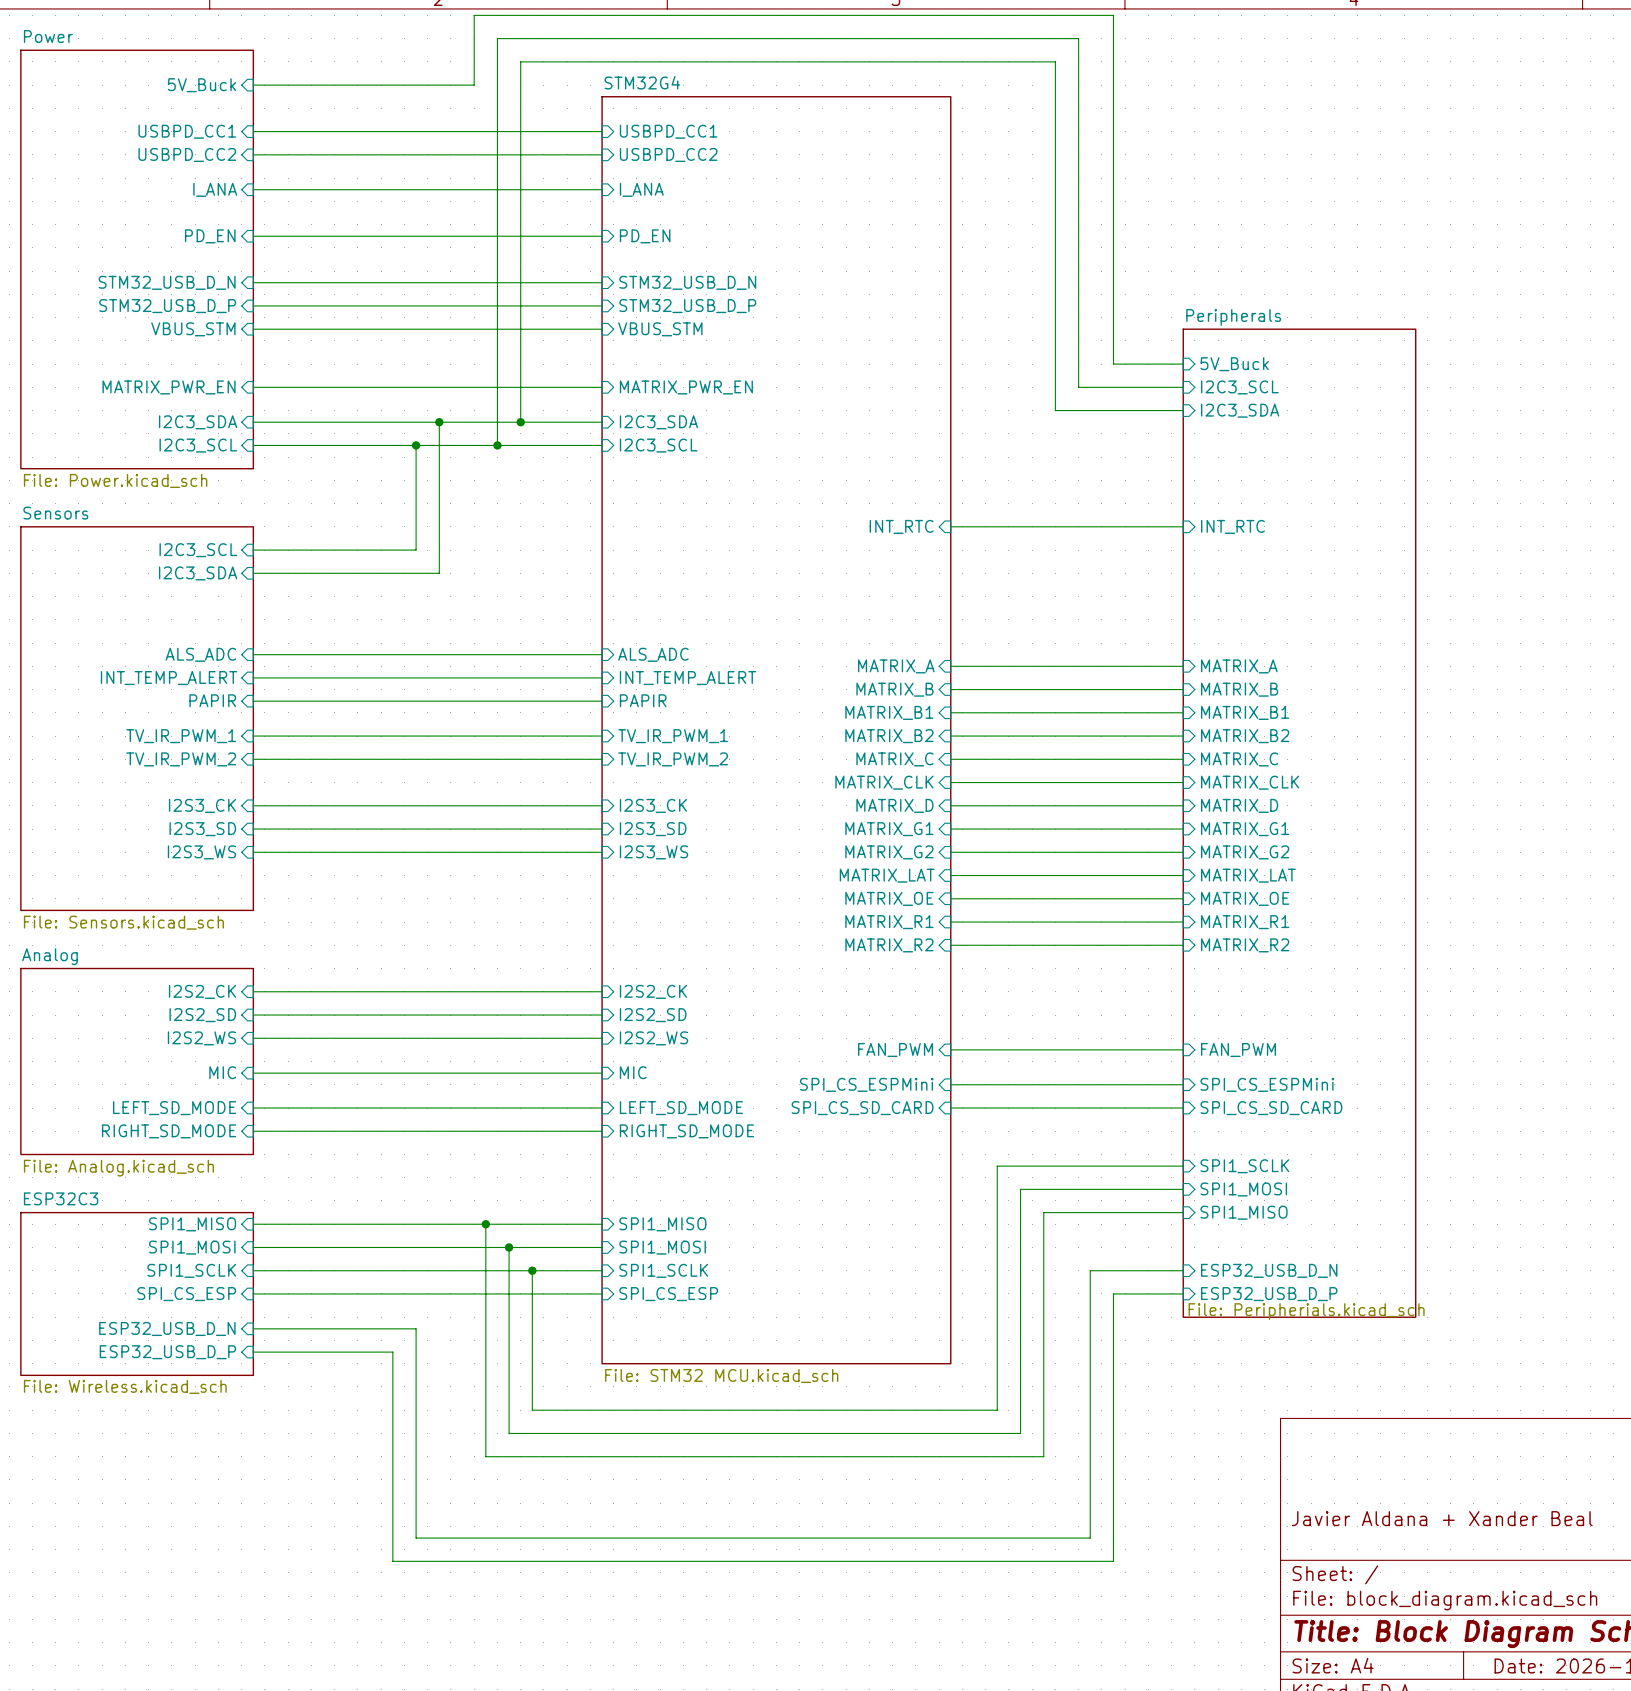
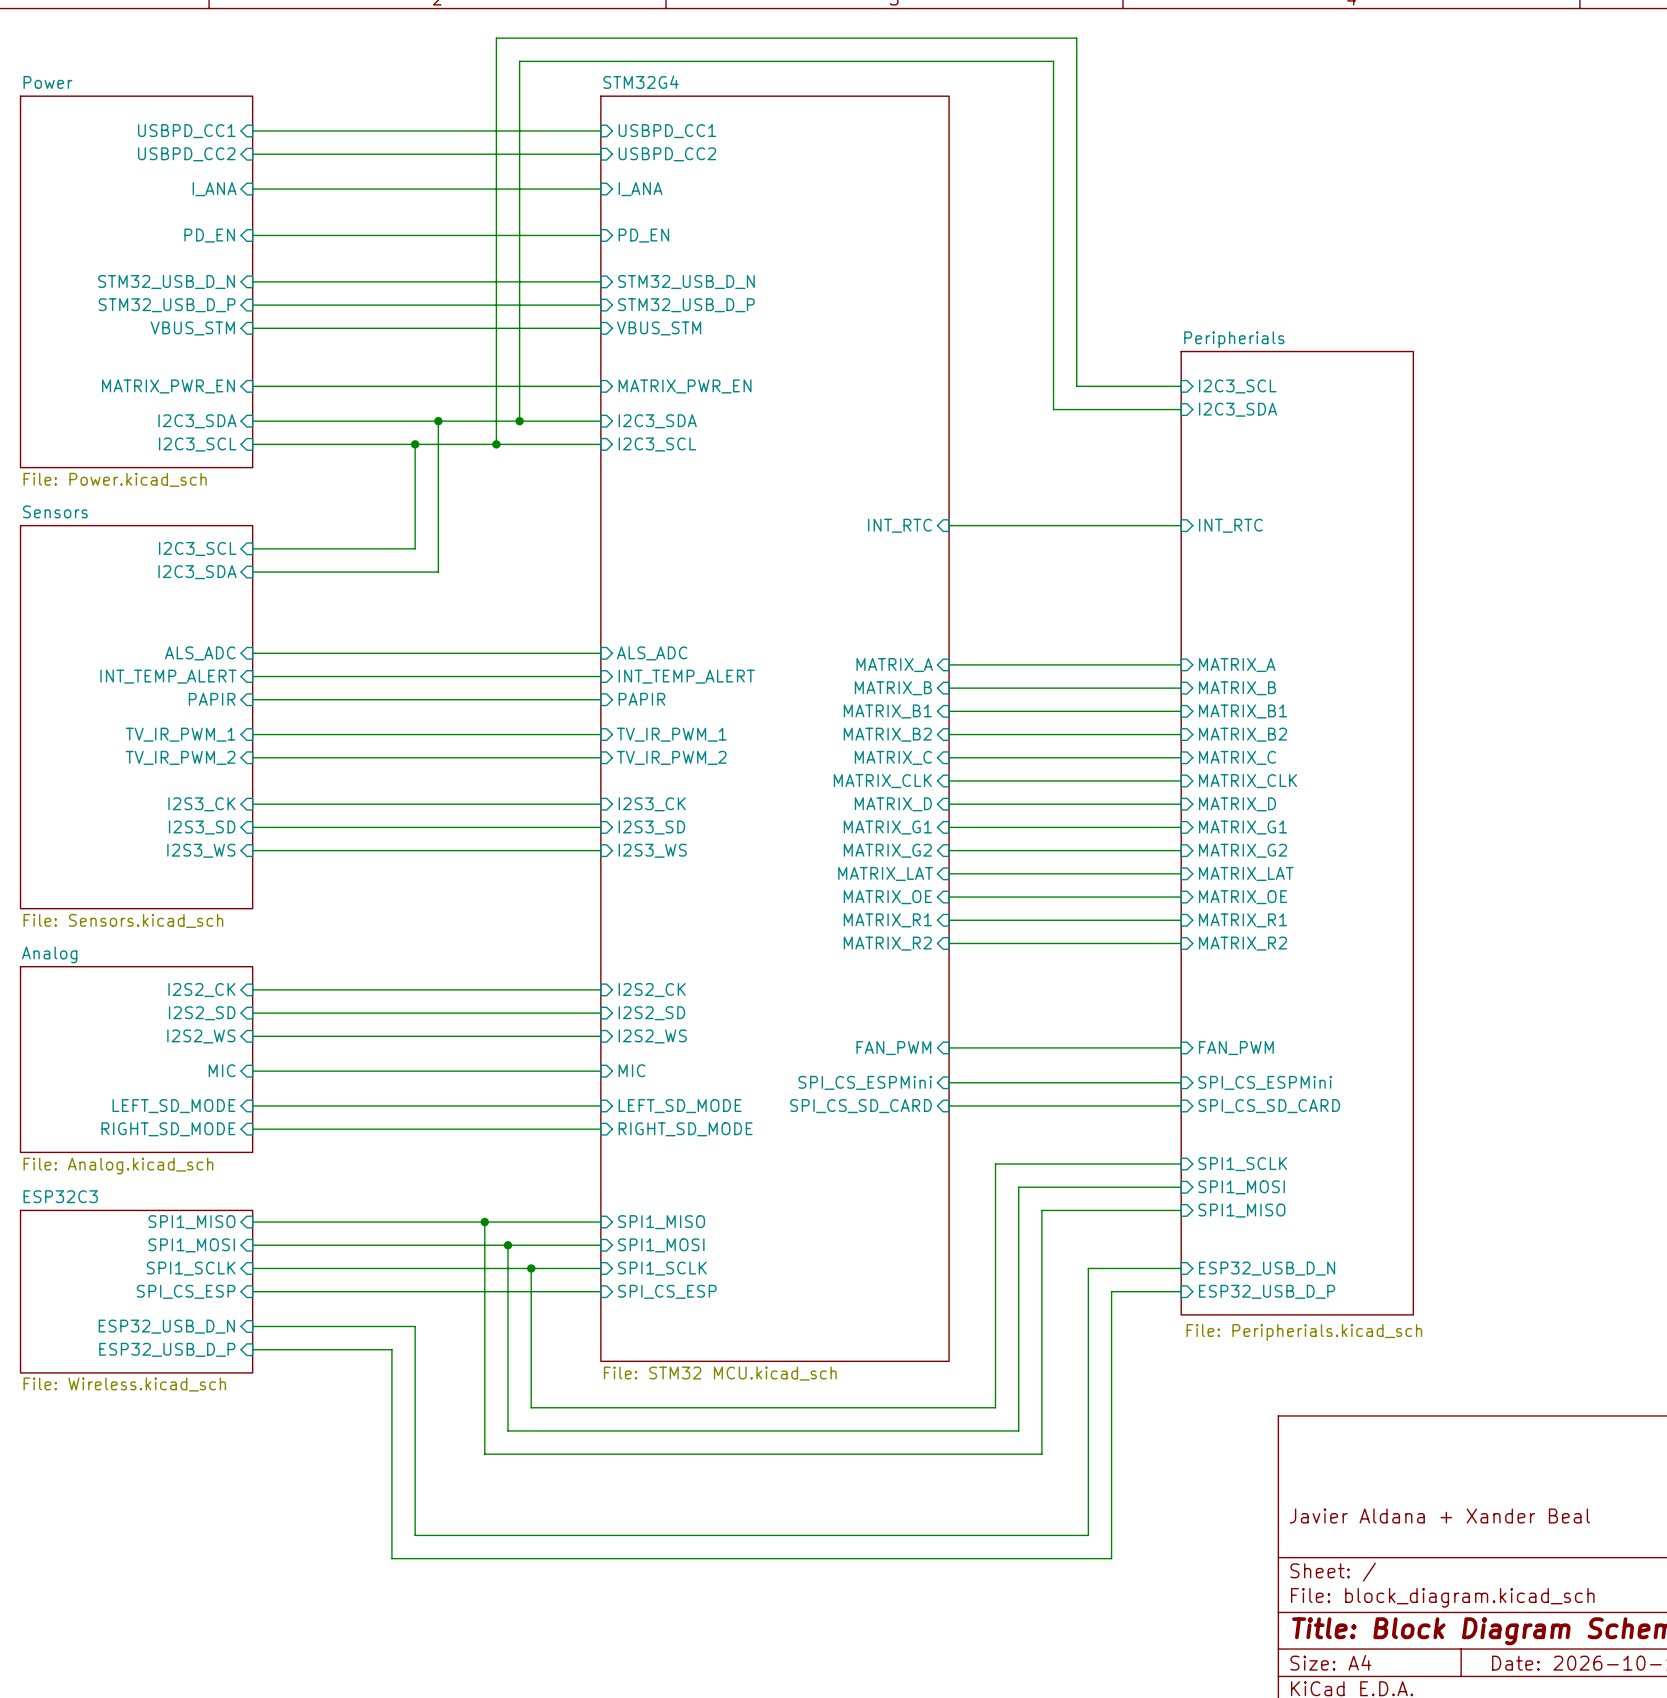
sheet pin: 5V_Buck (201, 85) -> none
wire: (253, 85) (474, 85) (474, 15) (1113, 15) (1113, 364) (1183, 364) -> none
sheet Power: File: Power.kicad_sch (137, 259) -> none
sheet Power: none -> File: Power.kicad_sch (136, 281)
sheet pin: 5V_Buck (1234, 364) -> none
sheet Peripherals: File: Peripherials.kicad_sch (1299, 823) -> none
sheet Peripherials: none -> File: Peripherials.kicad_sch (1297, 833)

